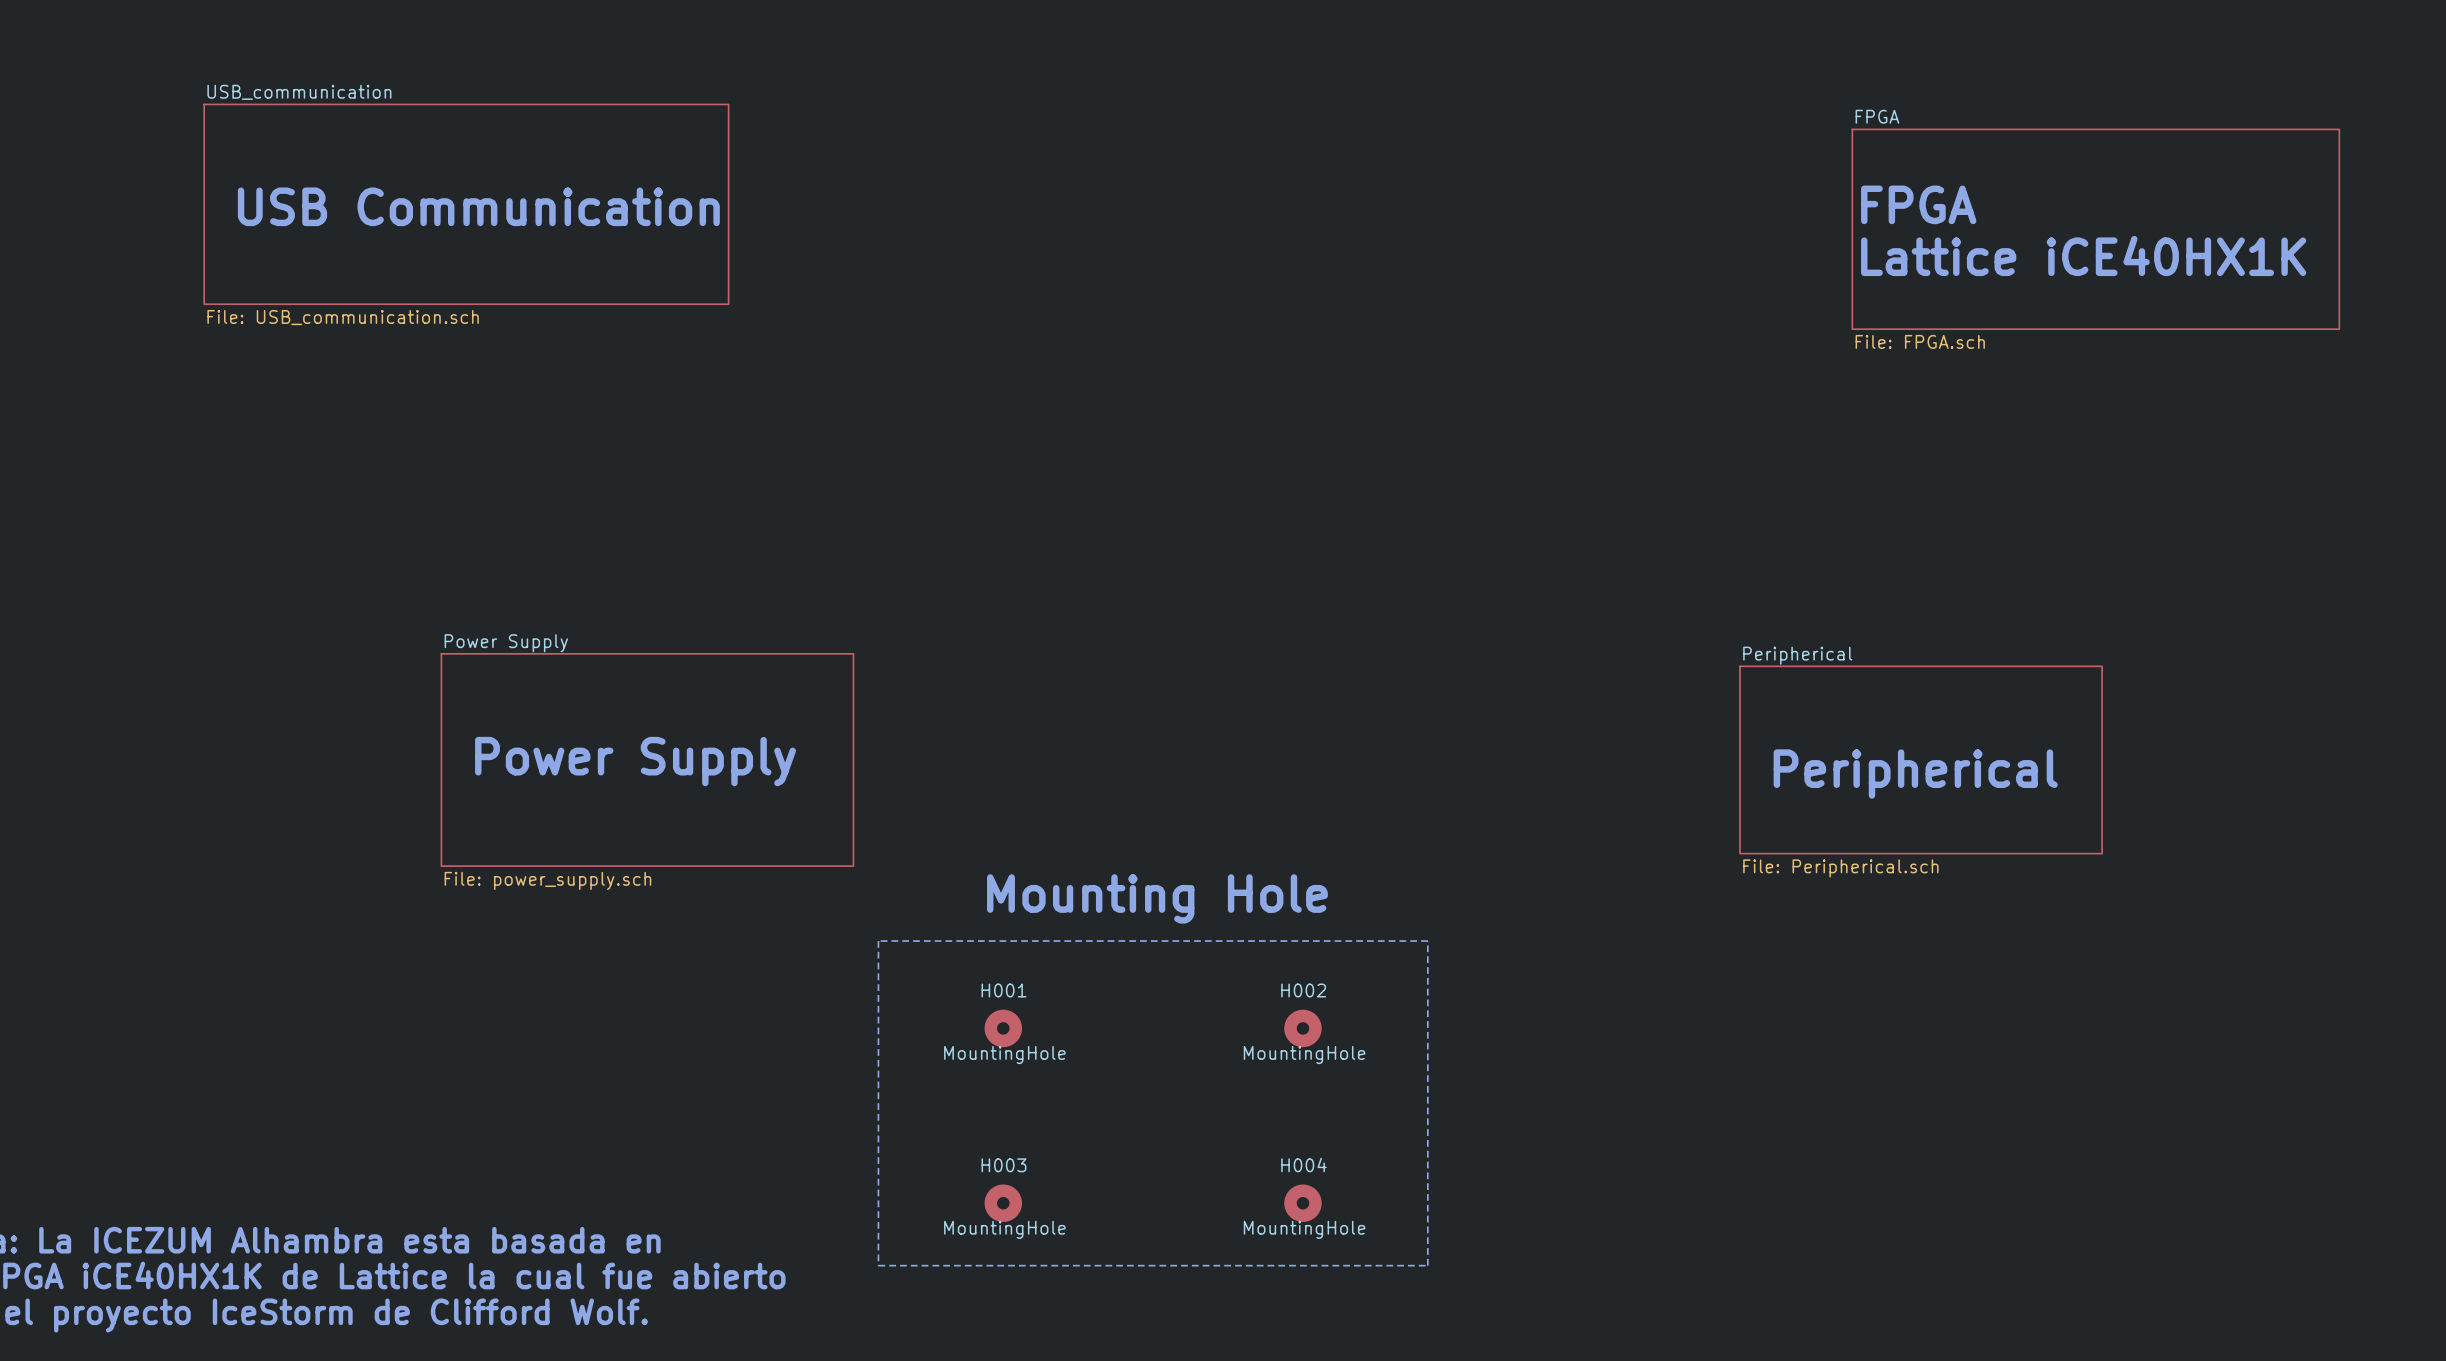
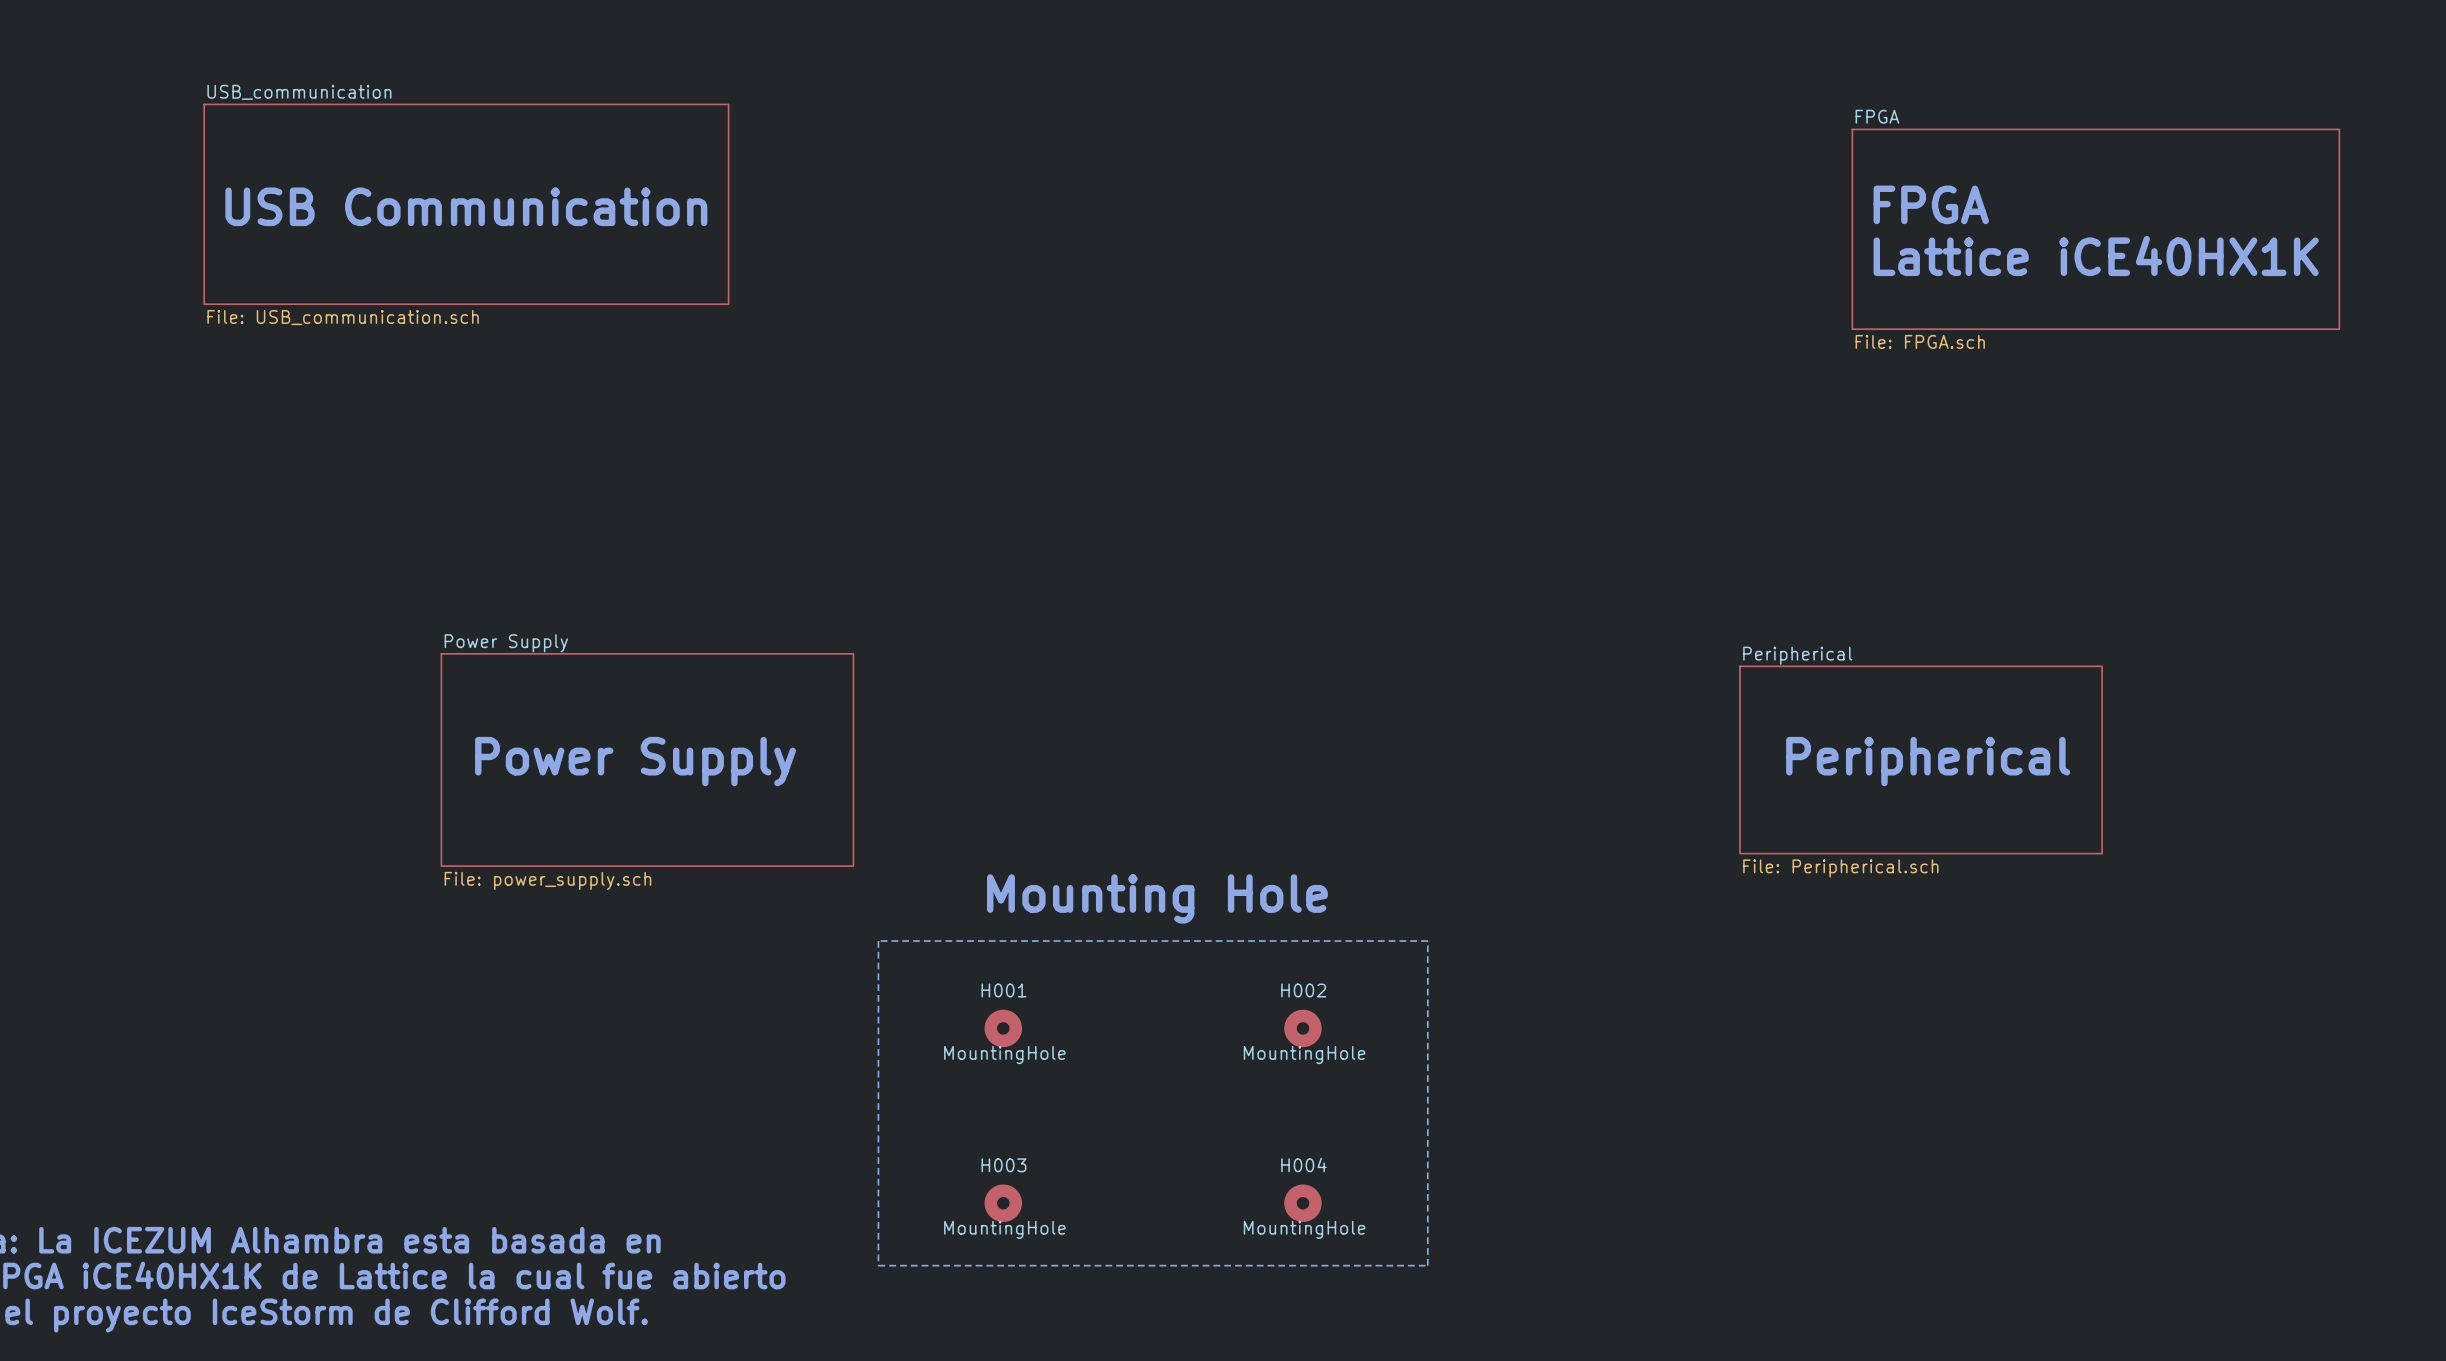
text position: FPGA (1918, 204) -> FPGA (1931, 204)
text position: USB Communication (478, 206) -> USB Communication (466, 206)
text position: Lattice iCE40HX1K (2083, 255) -> Lattice iCE40HX1K (2096, 255)
text position: Peripherical (1915, 774) -> Peripherical (1928, 761)

